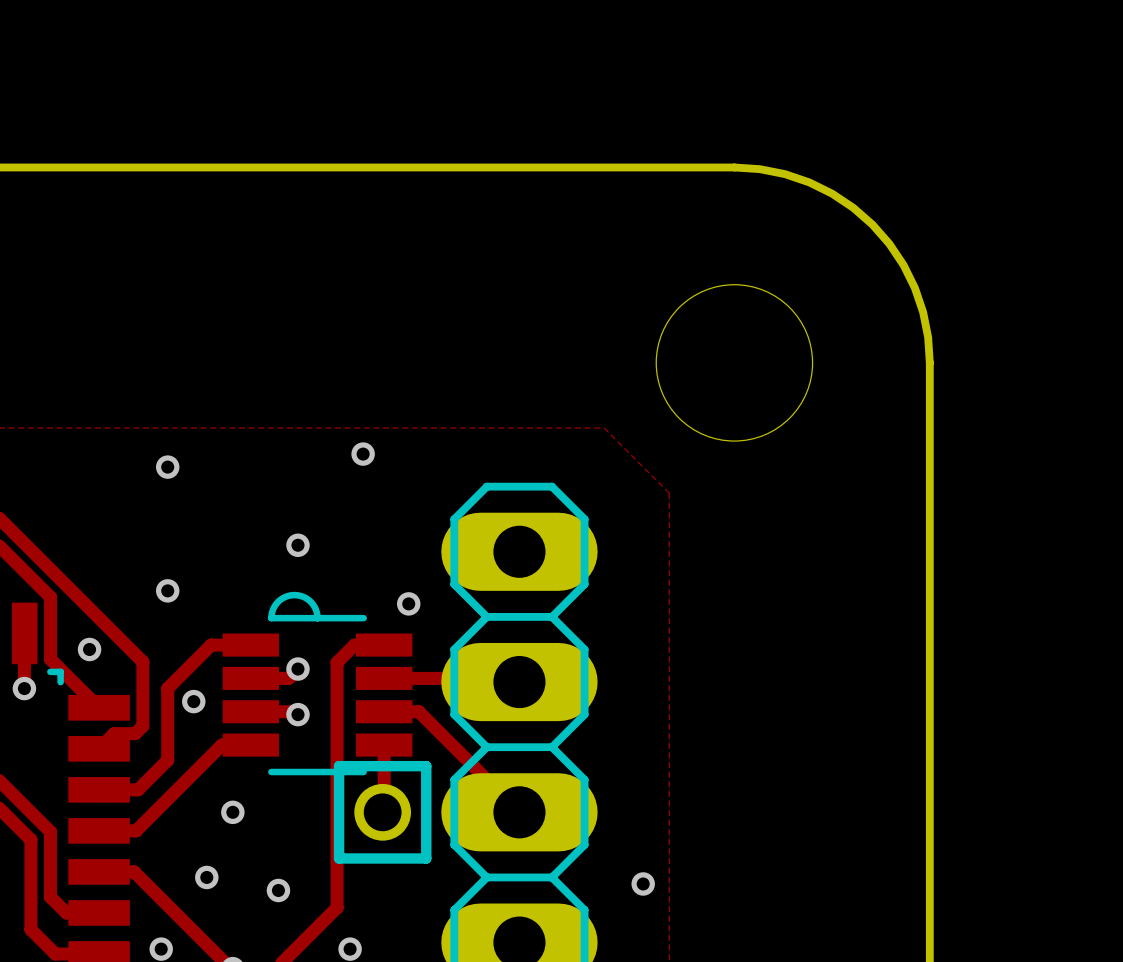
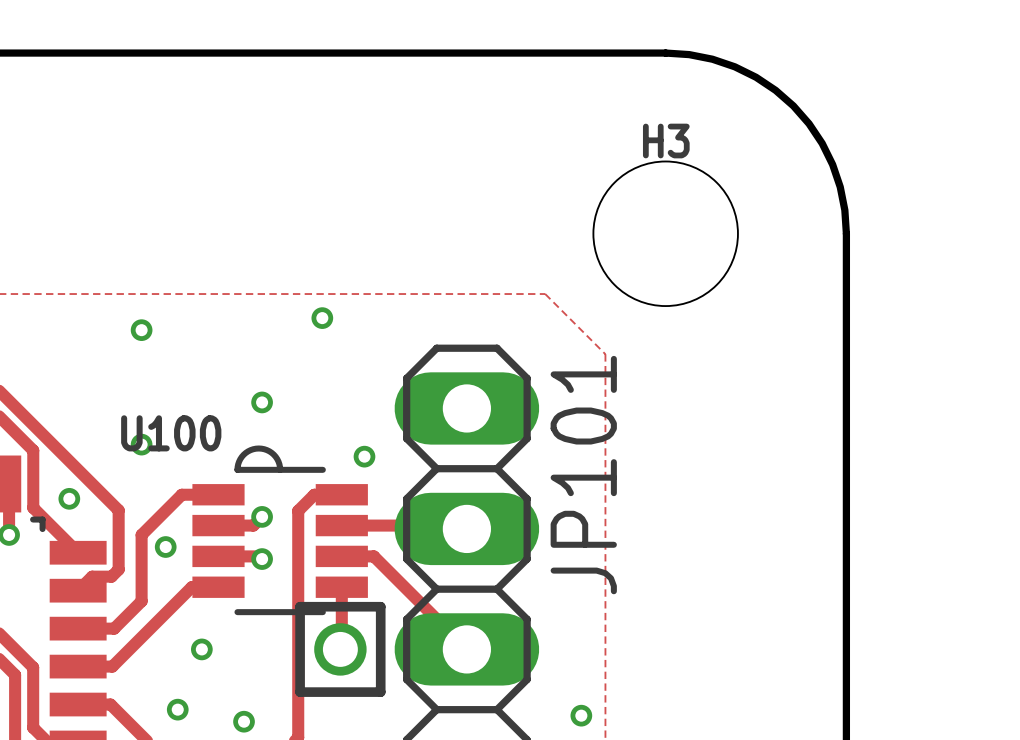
H3 name: none -> H3 (666, 141)
U100 name: none -> U100 (171, 433)
JP101 name: none -> JP101 (583, 475)

